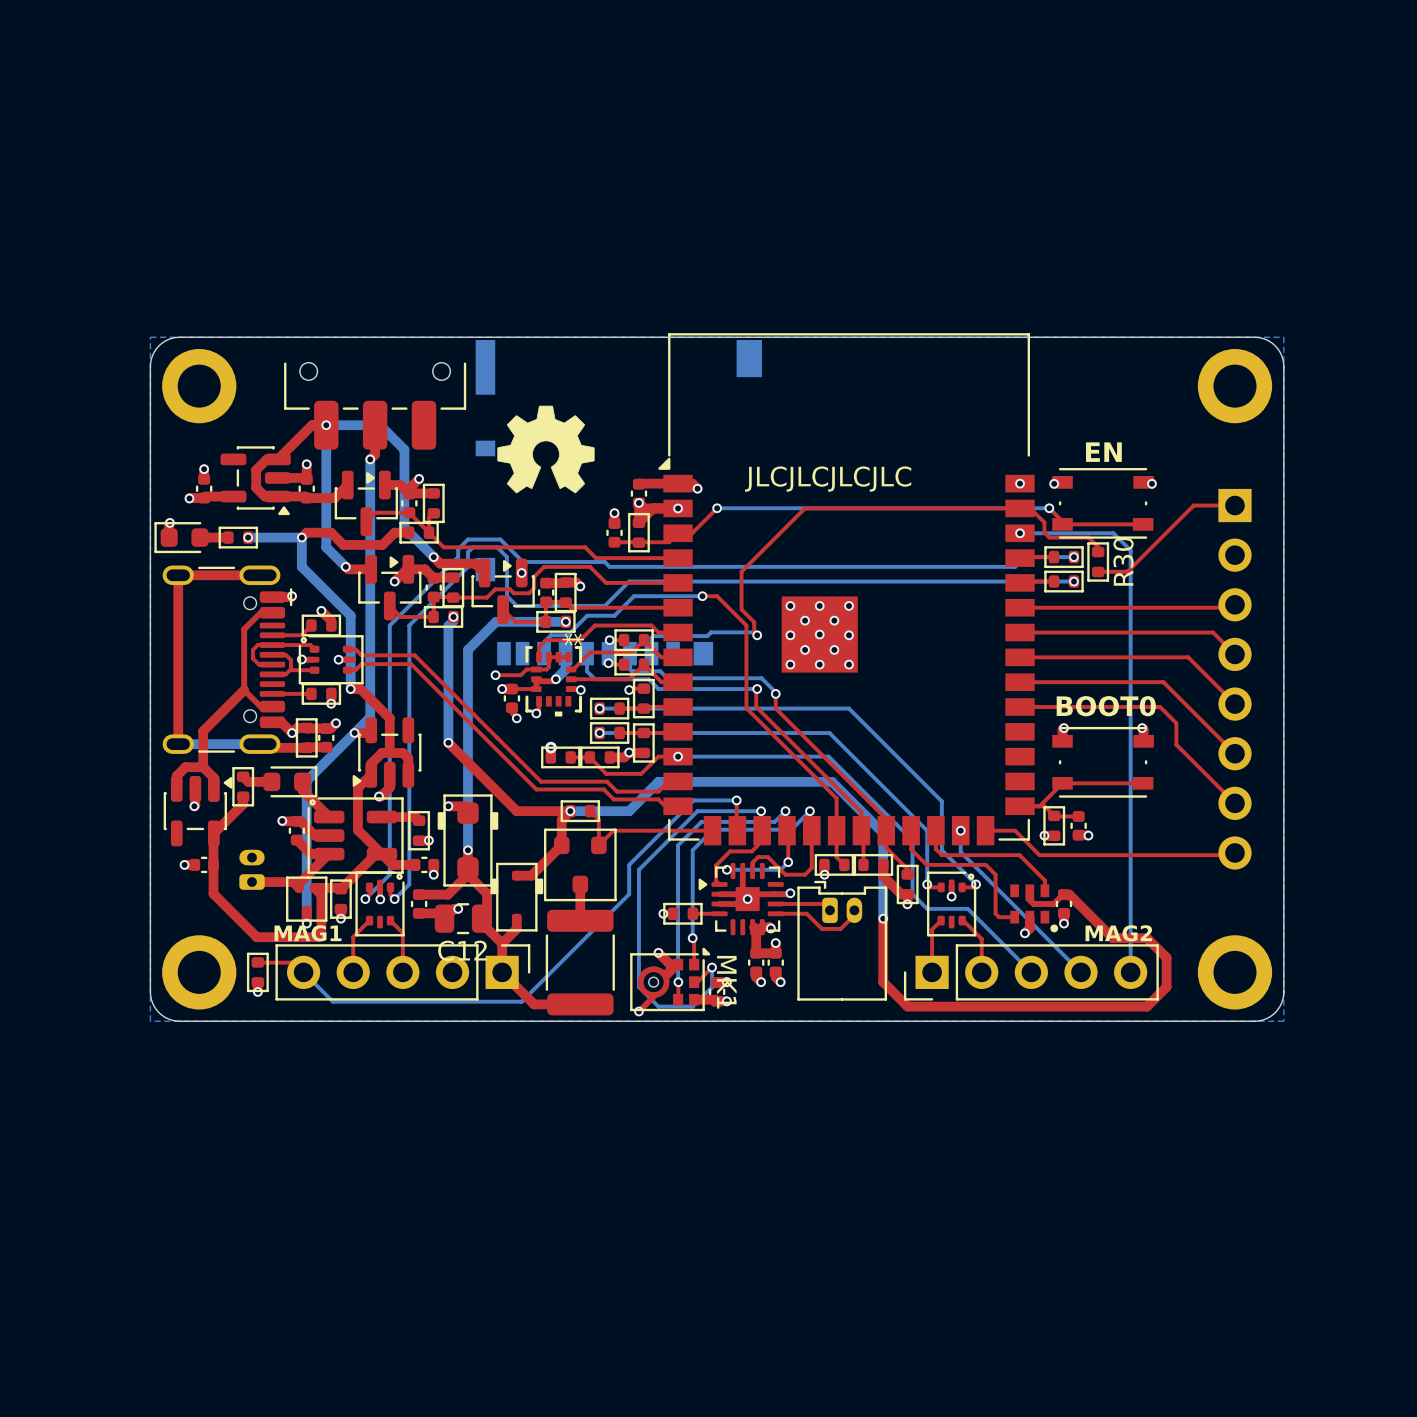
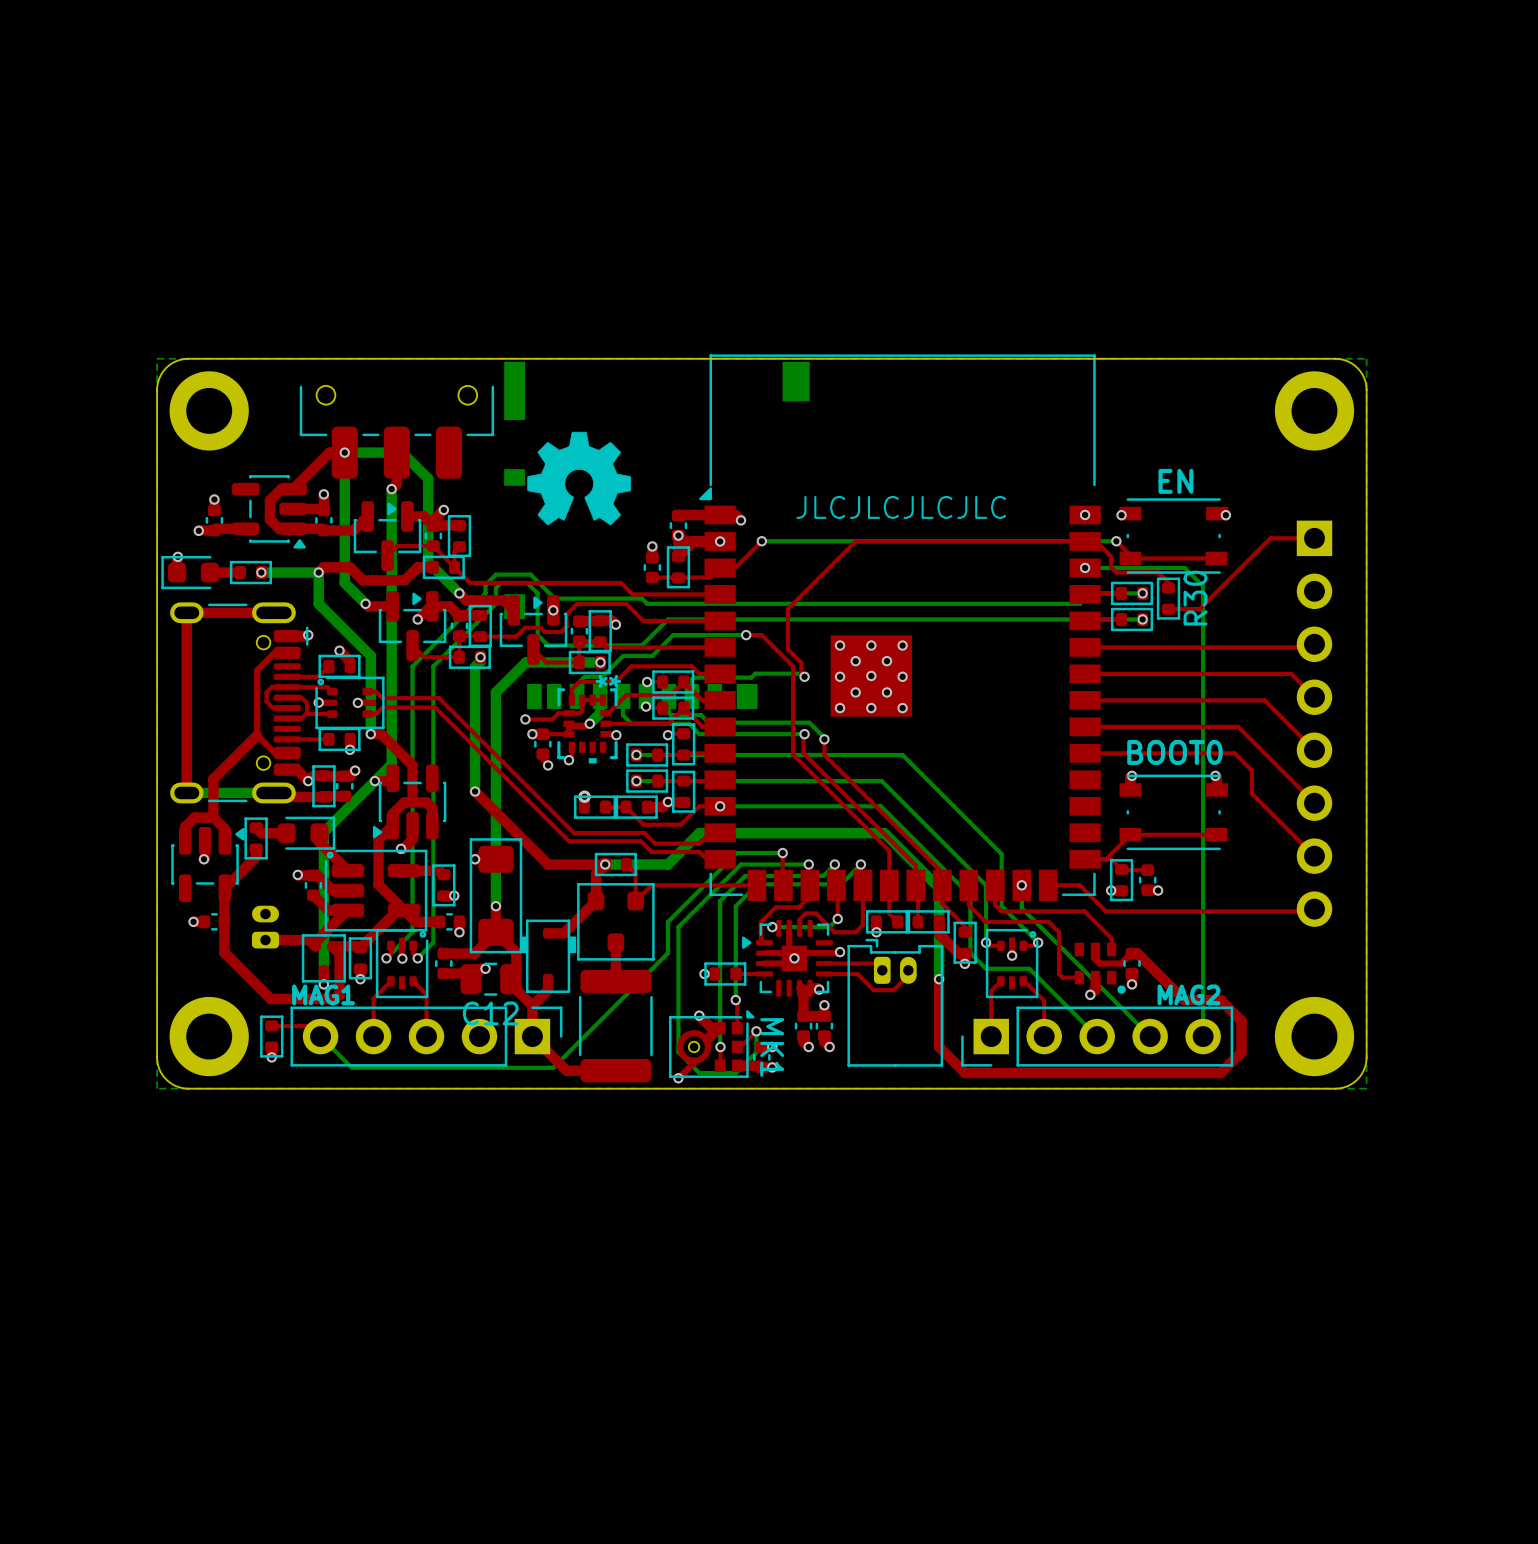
part footprint: [437, 794, 499, 887] -> [469, 838, 523, 954]

